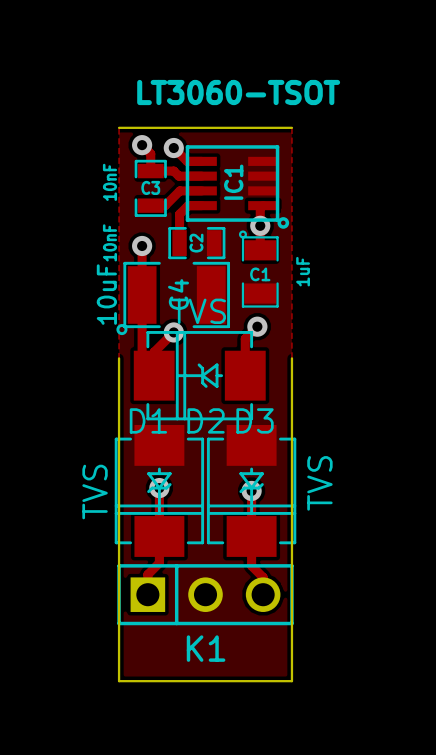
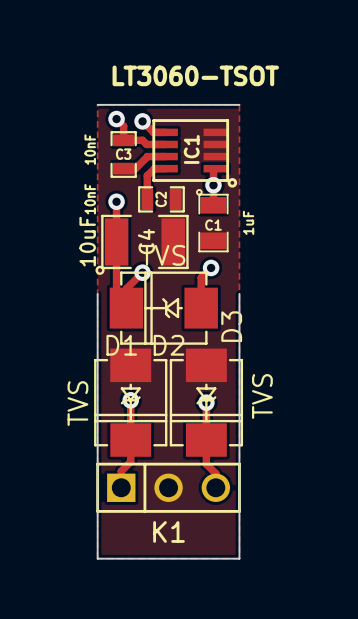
D3 name rotation: 0° (255, 420) -> 90° counterclockwise (231, 326)

